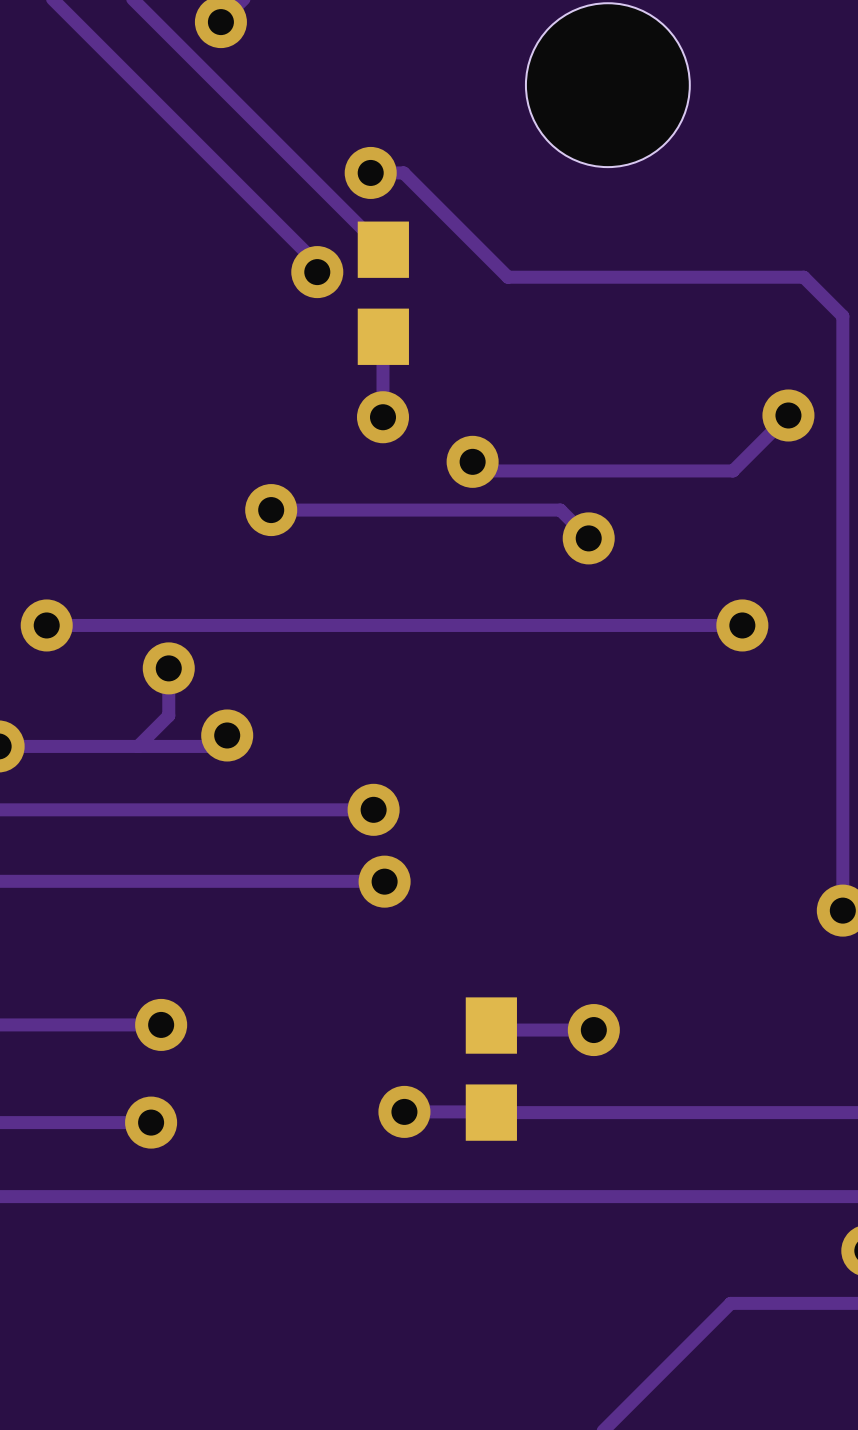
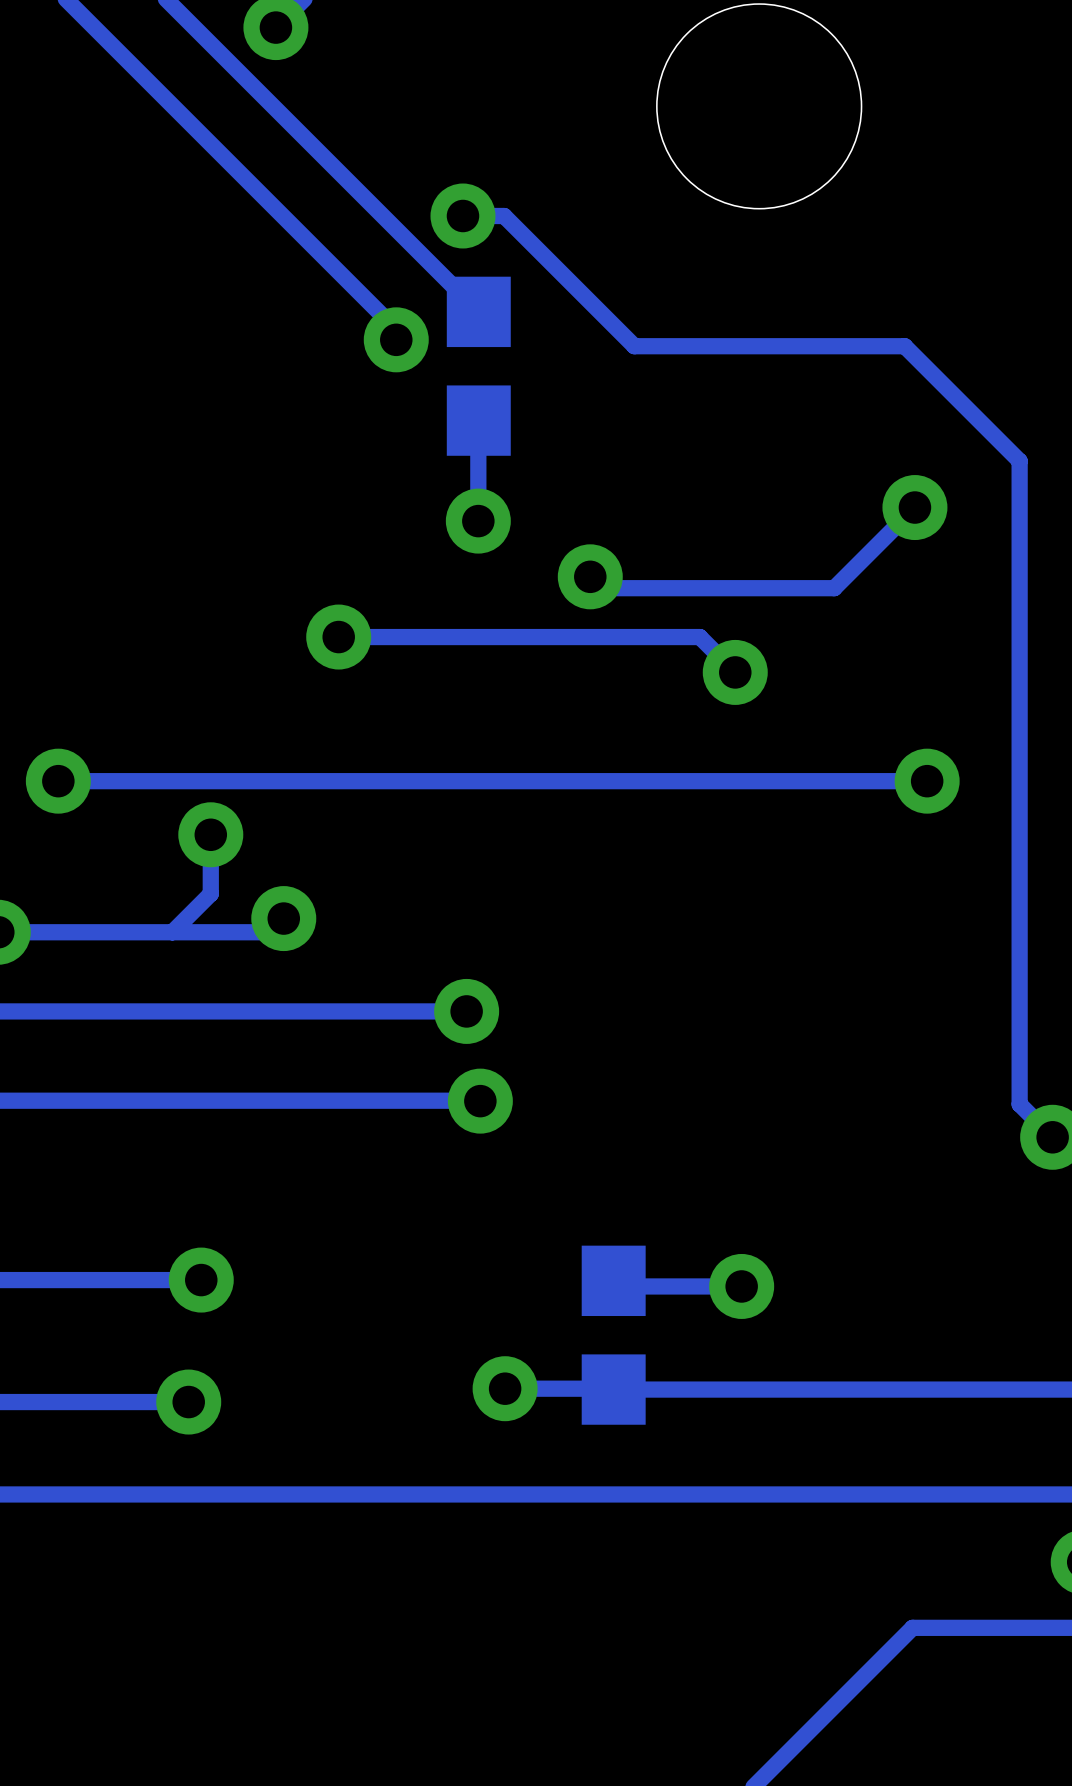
track: (724, 277) (803, 277) (842, 316) (842, 910) -> (904, 346) (1019, 461) (1019, 1104) (1052, 1137)
track: (788, 415) (732, 470) (668, 470) -> (914, 507) (834, 588)
via position: (788, 415) -> (914, 507)

